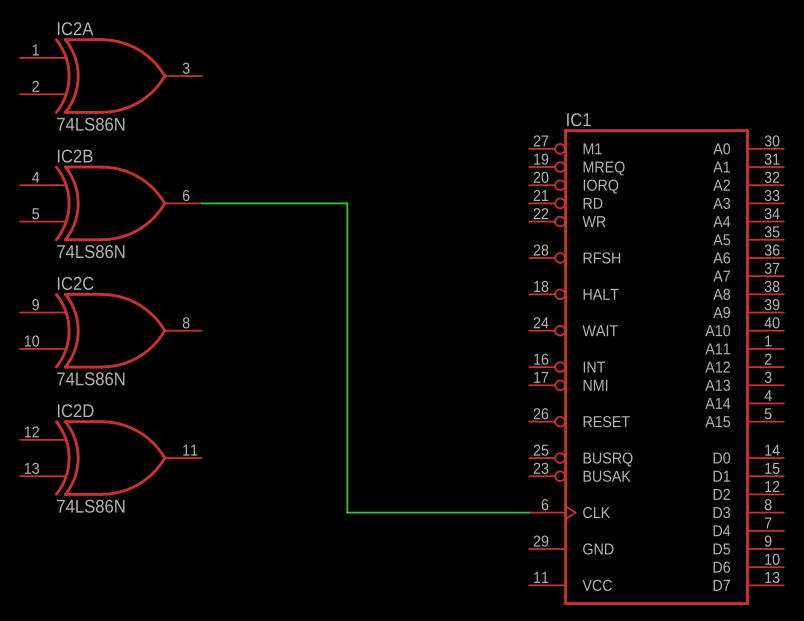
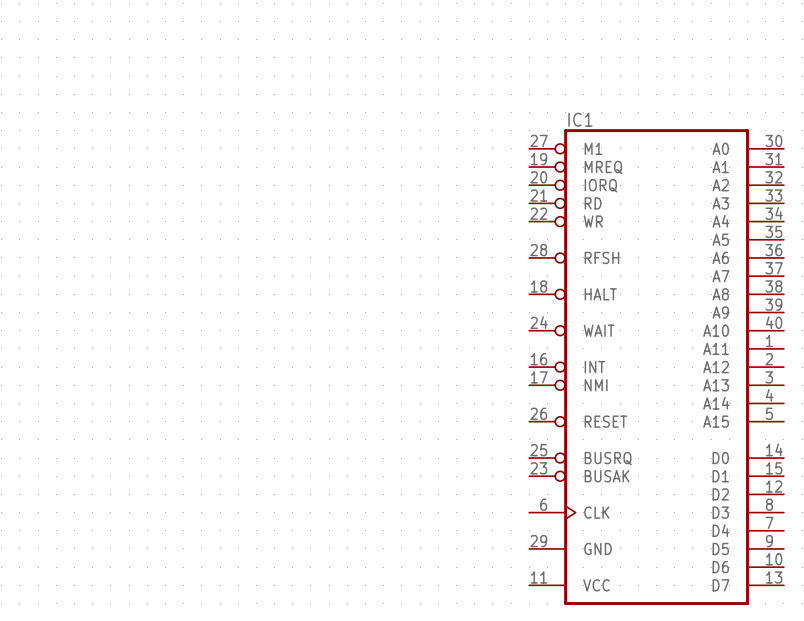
IC2A: 74LS86N (110, 76) -> none
IC2B: 74LS86N (110, 203) -> none
wire: (201, 203) (347, 203) (347, 512) (529, 512) -> none
IC2C: 74LS86N (110, 330) -> none
IC2D: 74LS86N (110, 458) -> none

